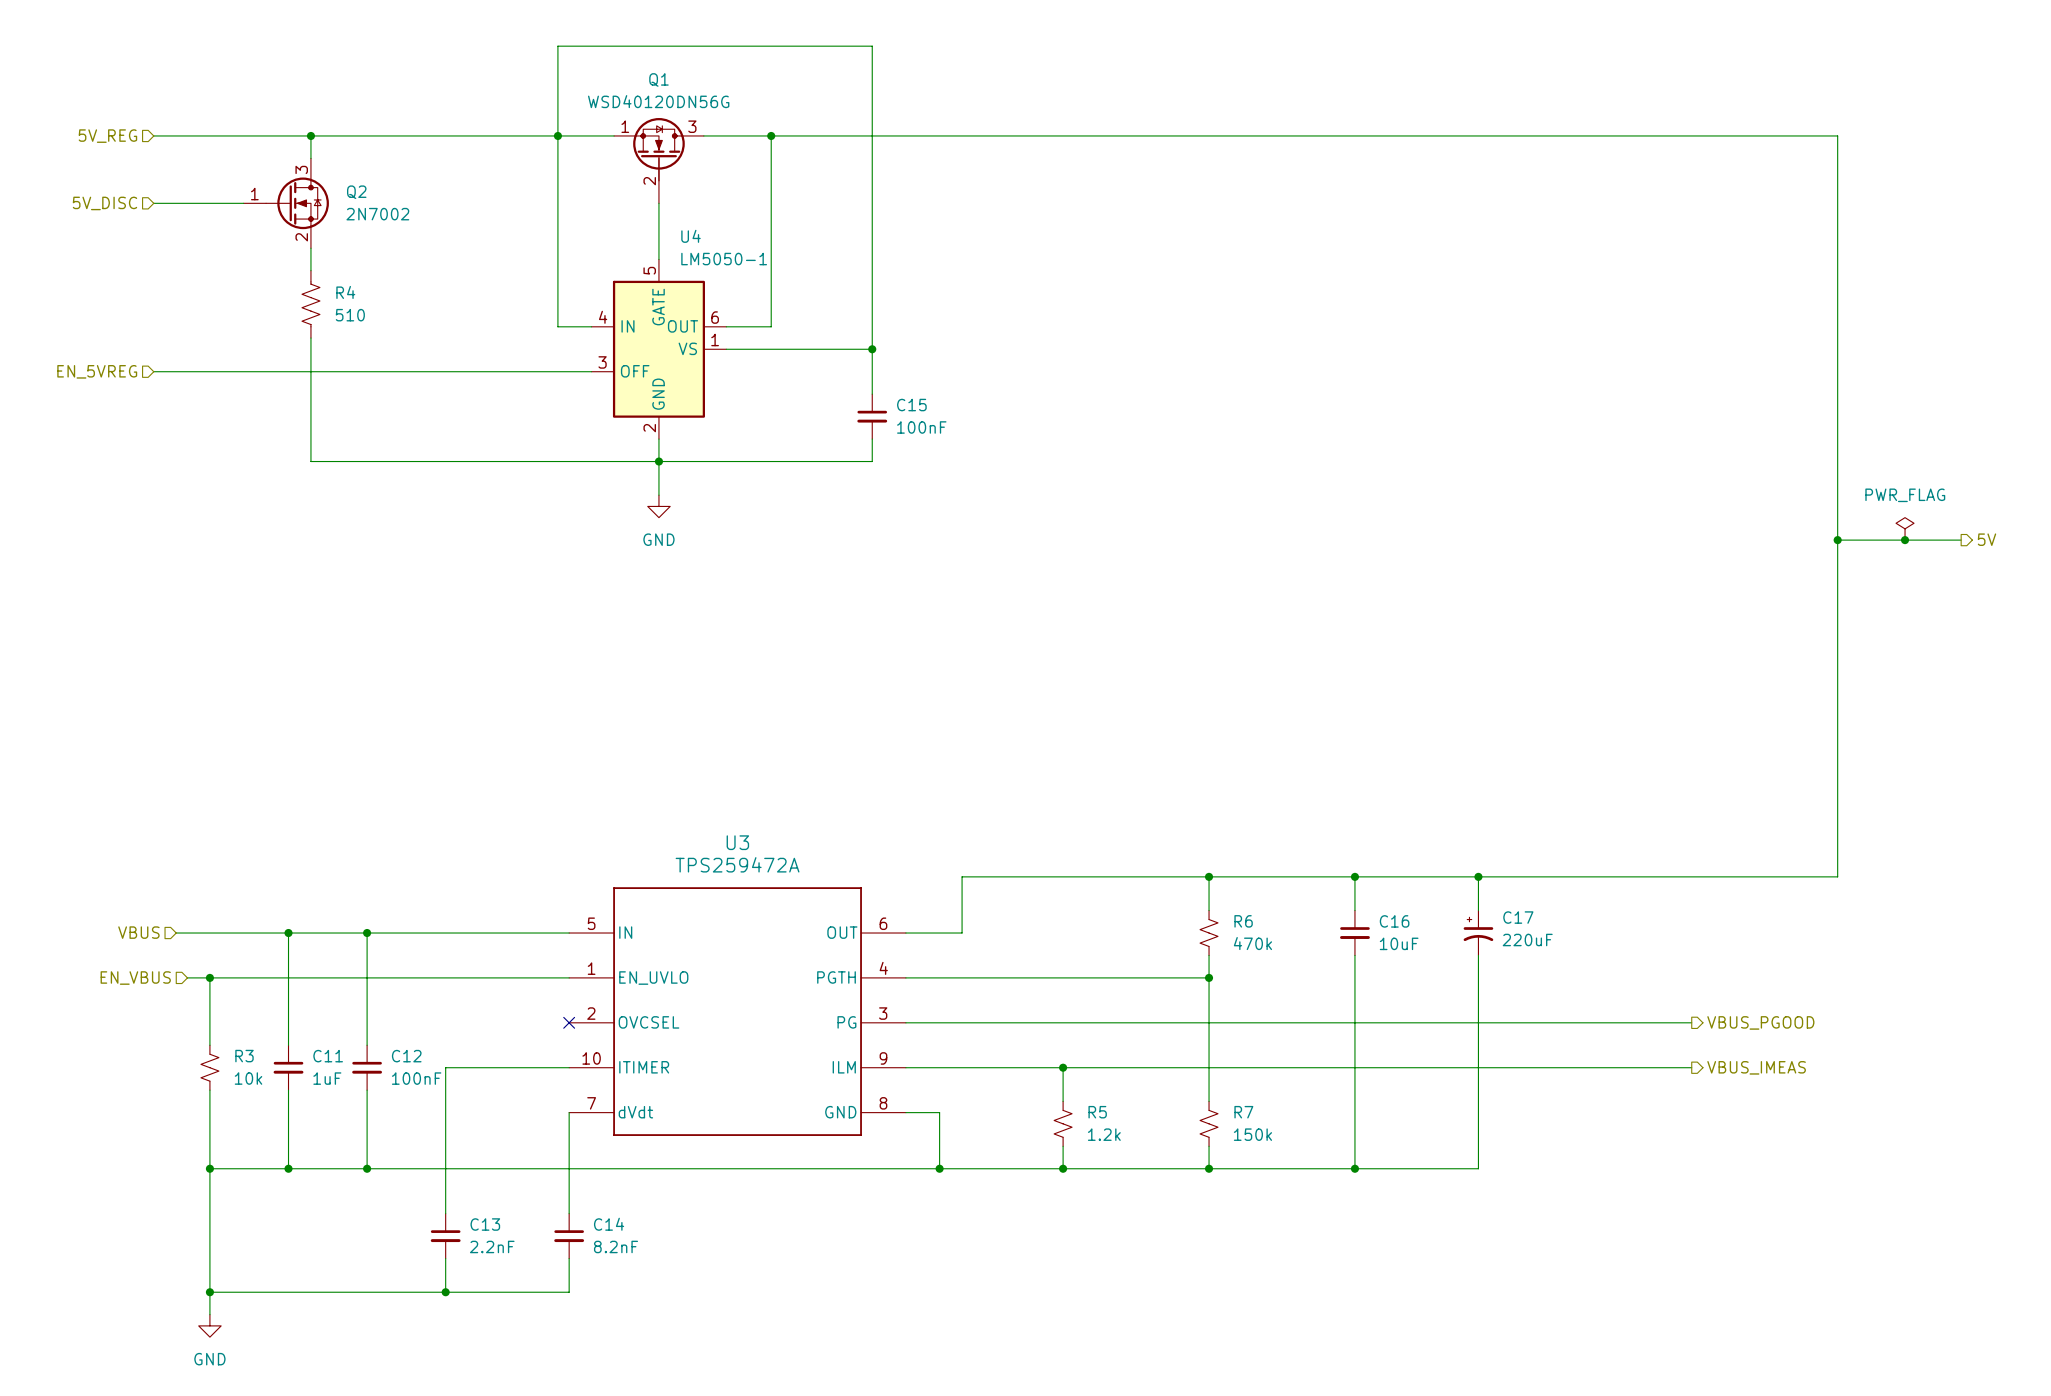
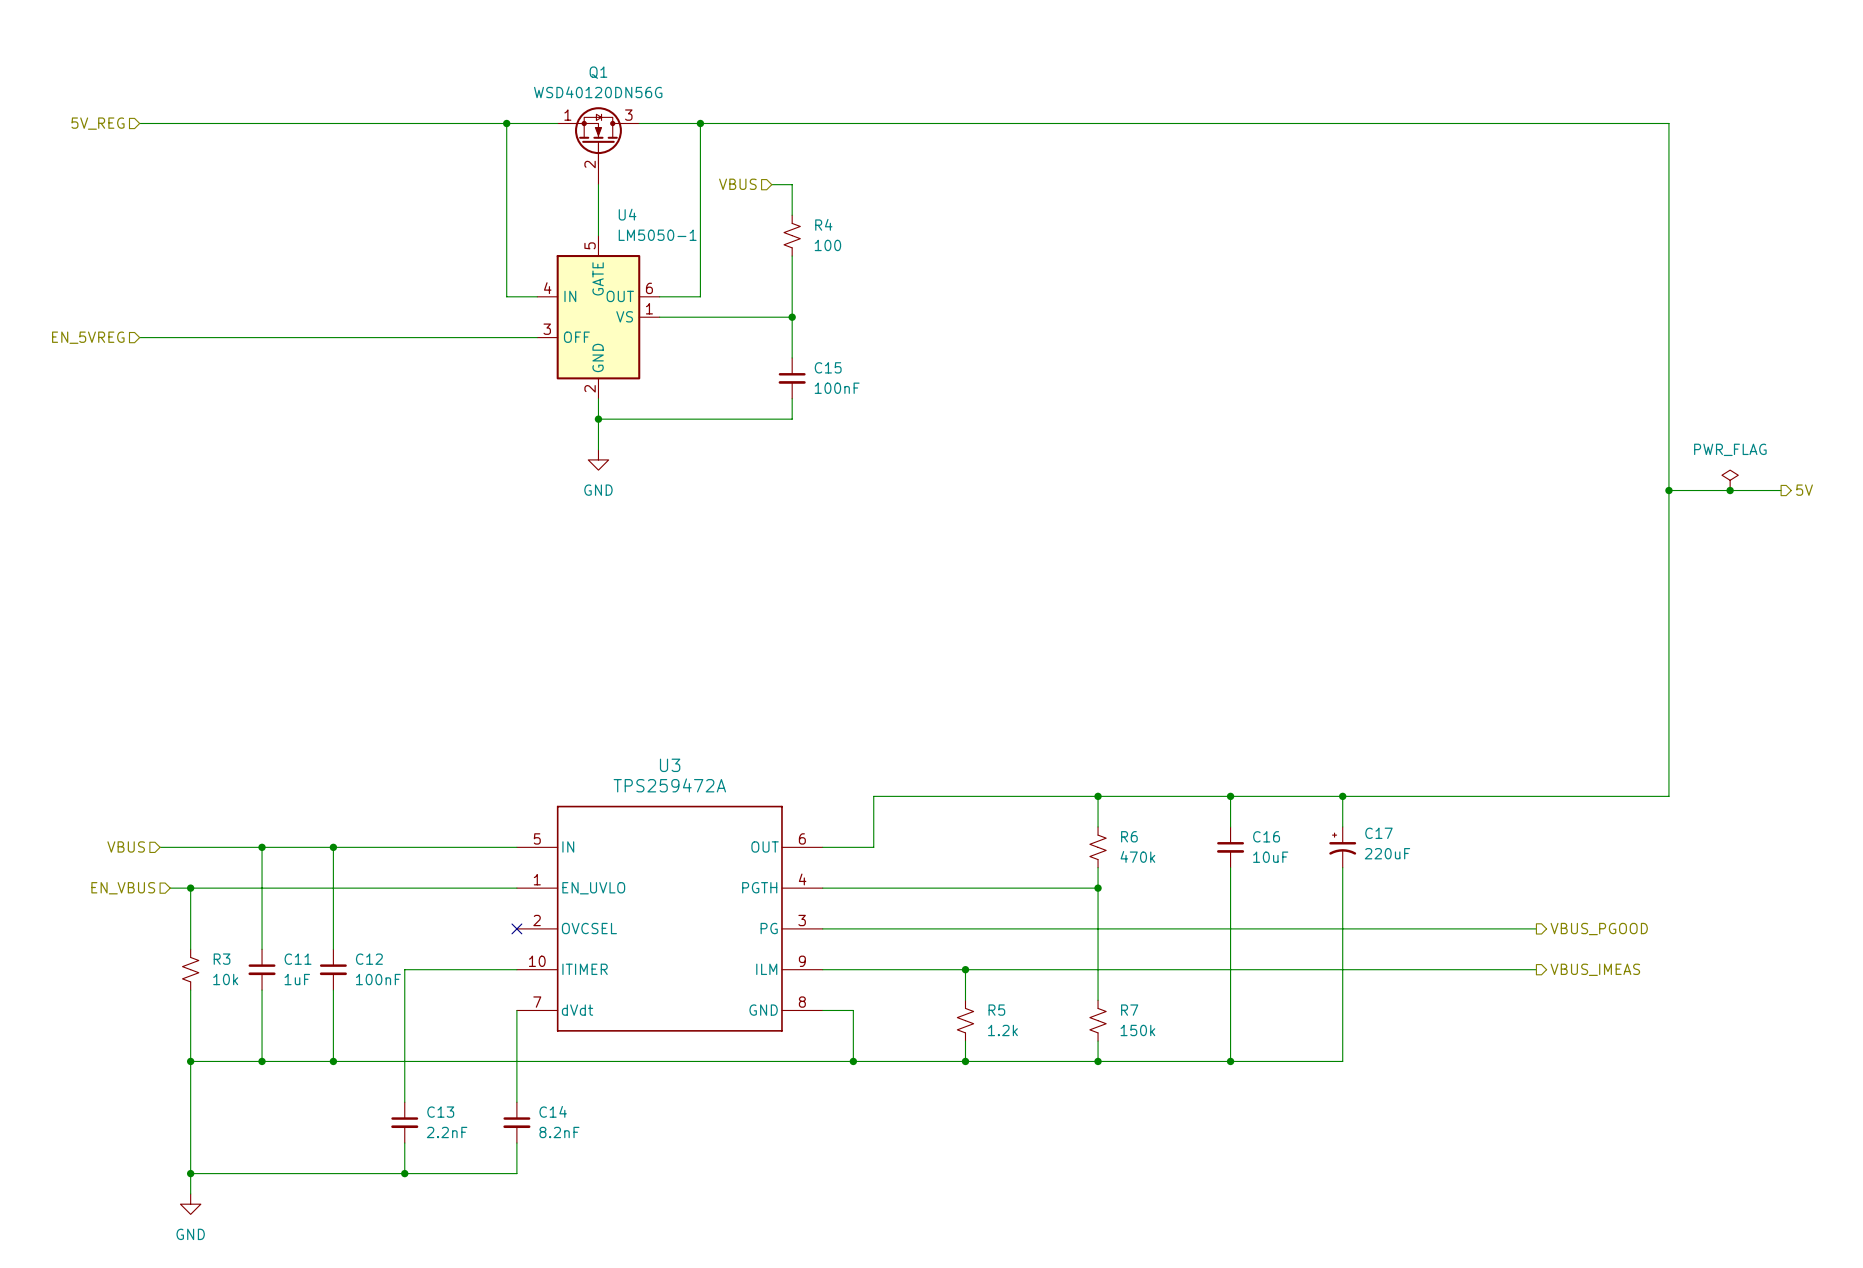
wire: (310, 135) (310, 158) -> none
junction: (310, 135) -> none
wire: (557, 135) (557, 46) (872, 46) (872, 203) -> (771, 184) (792, 184)
hierarchical label: none -> VBUS (737, 184)
hierarchical label: 5V_DISC (104, 203) -> none
wire: (153, 203) (243, 203) -> none
Q2: 2N7002 (286, 203) -> none
wire: (310, 248) (310, 270) -> none
R4 symbol: [301, 270, 320, 339] -> [784, 215, 801, 257]
R4 value: 510 (350, 315) -> 100 (827, 245)
wire: (310, 338) (310, 461) (658, 461) -> none

